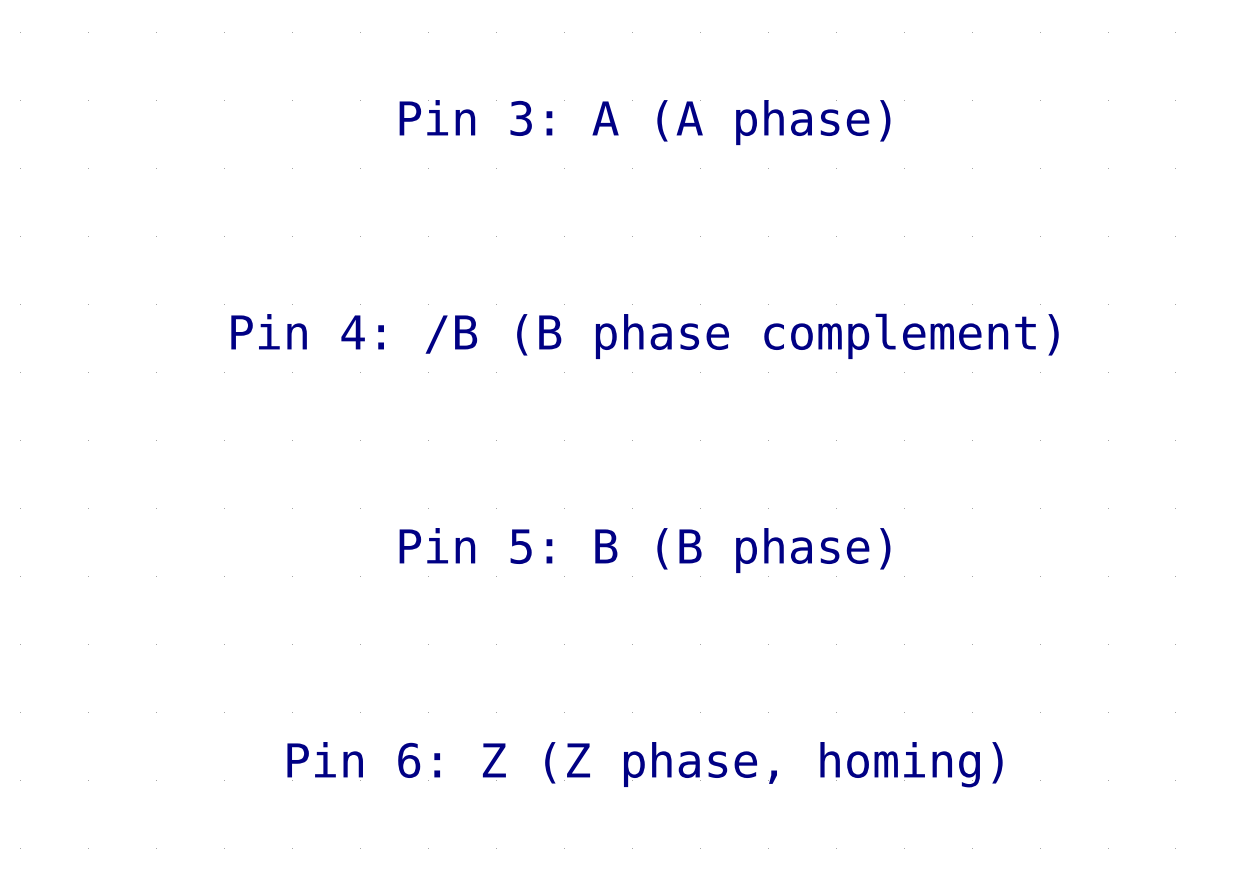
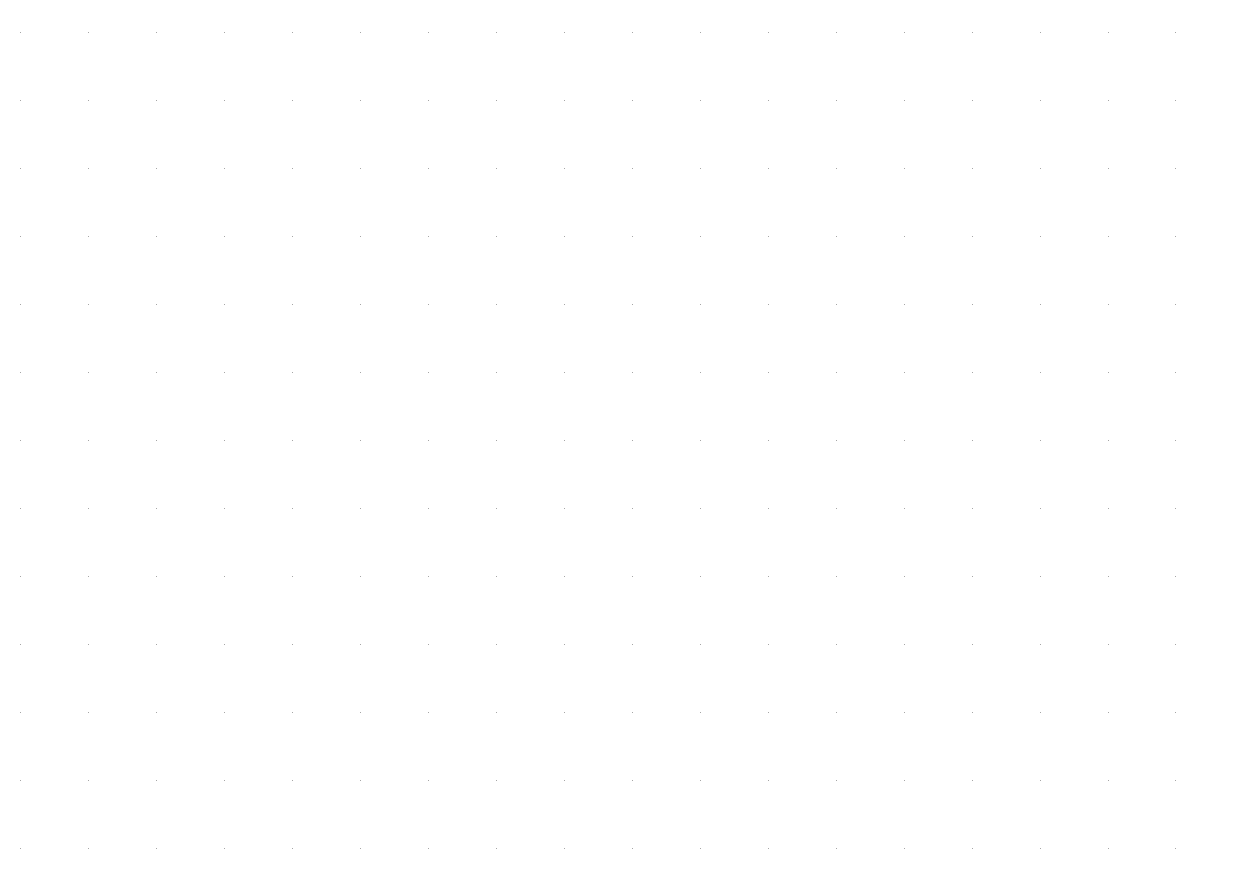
text: Pin 3: A (A phase) (645, 122) -> none
text: Pin 4: /B (B phase complement) (645, 336) -> none
text: Pin 5: B (B phase) (645, 550) -> none
text: Pin 6: Z (Z phase, homing) (645, 764) -> none

